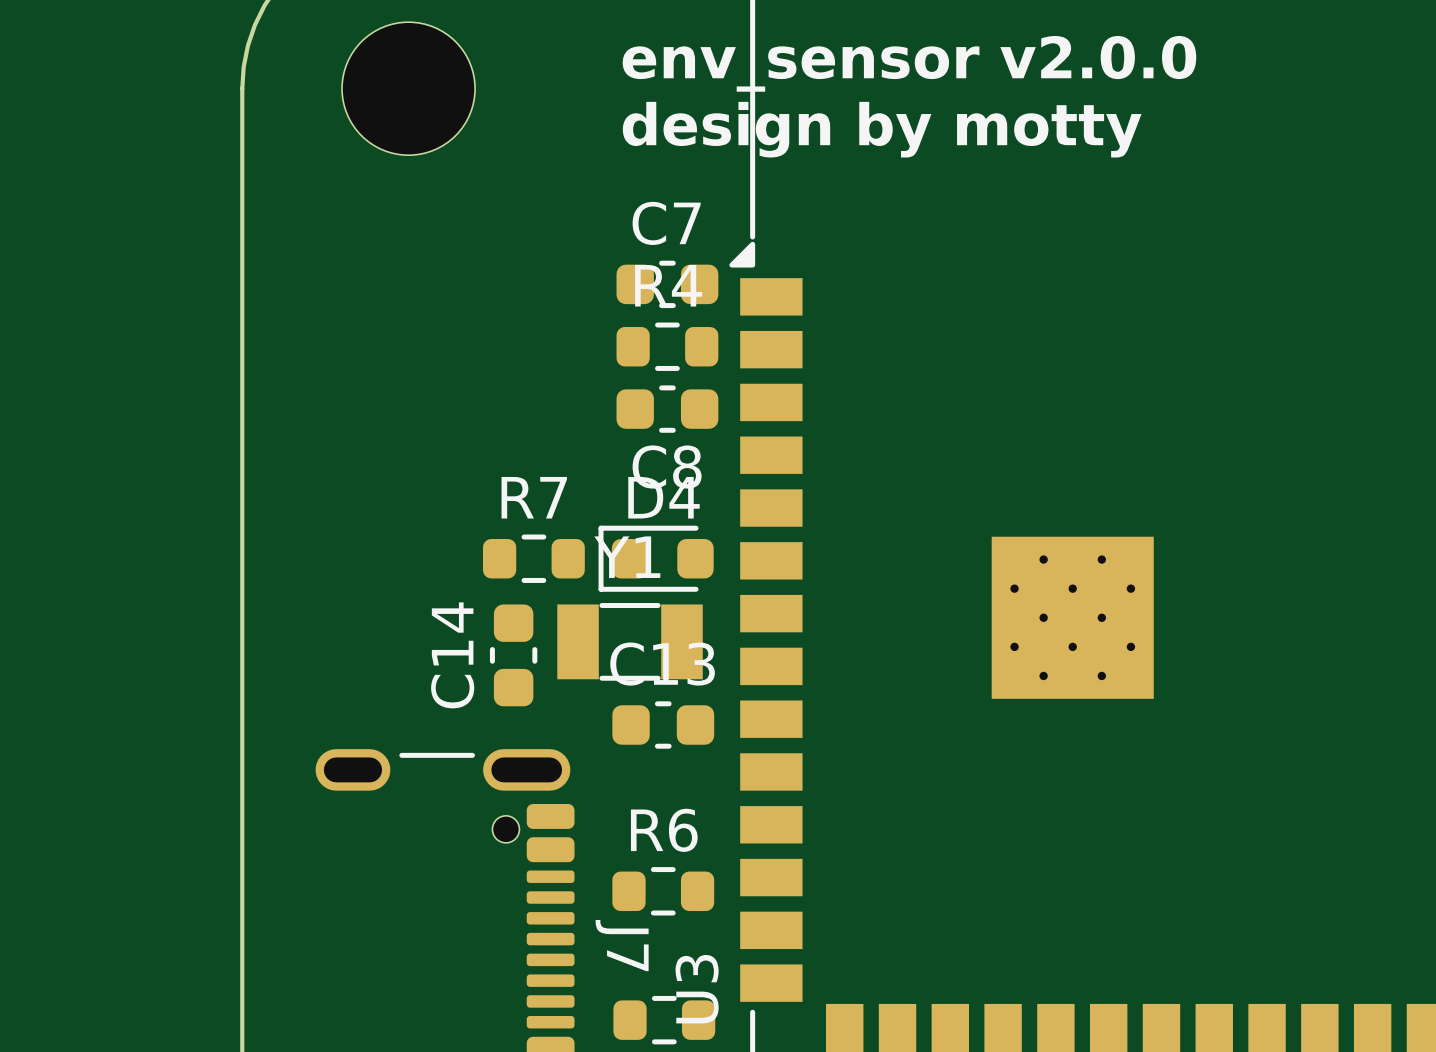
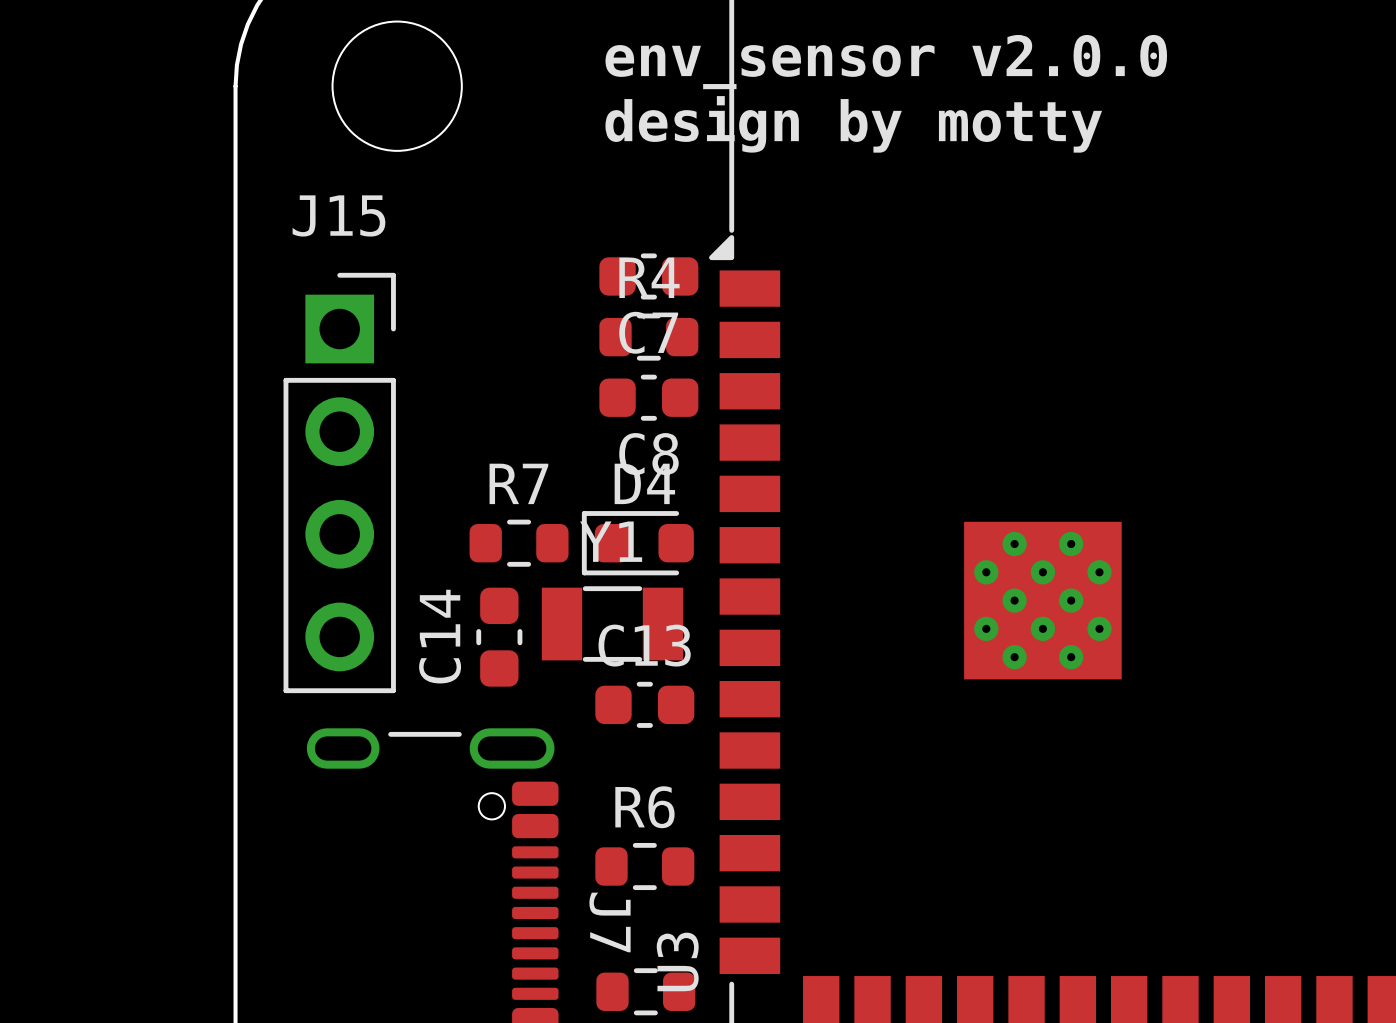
C7 name position: C7 (666, 223) -> C7 (648, 332)
J15: none -> (339, 482)

